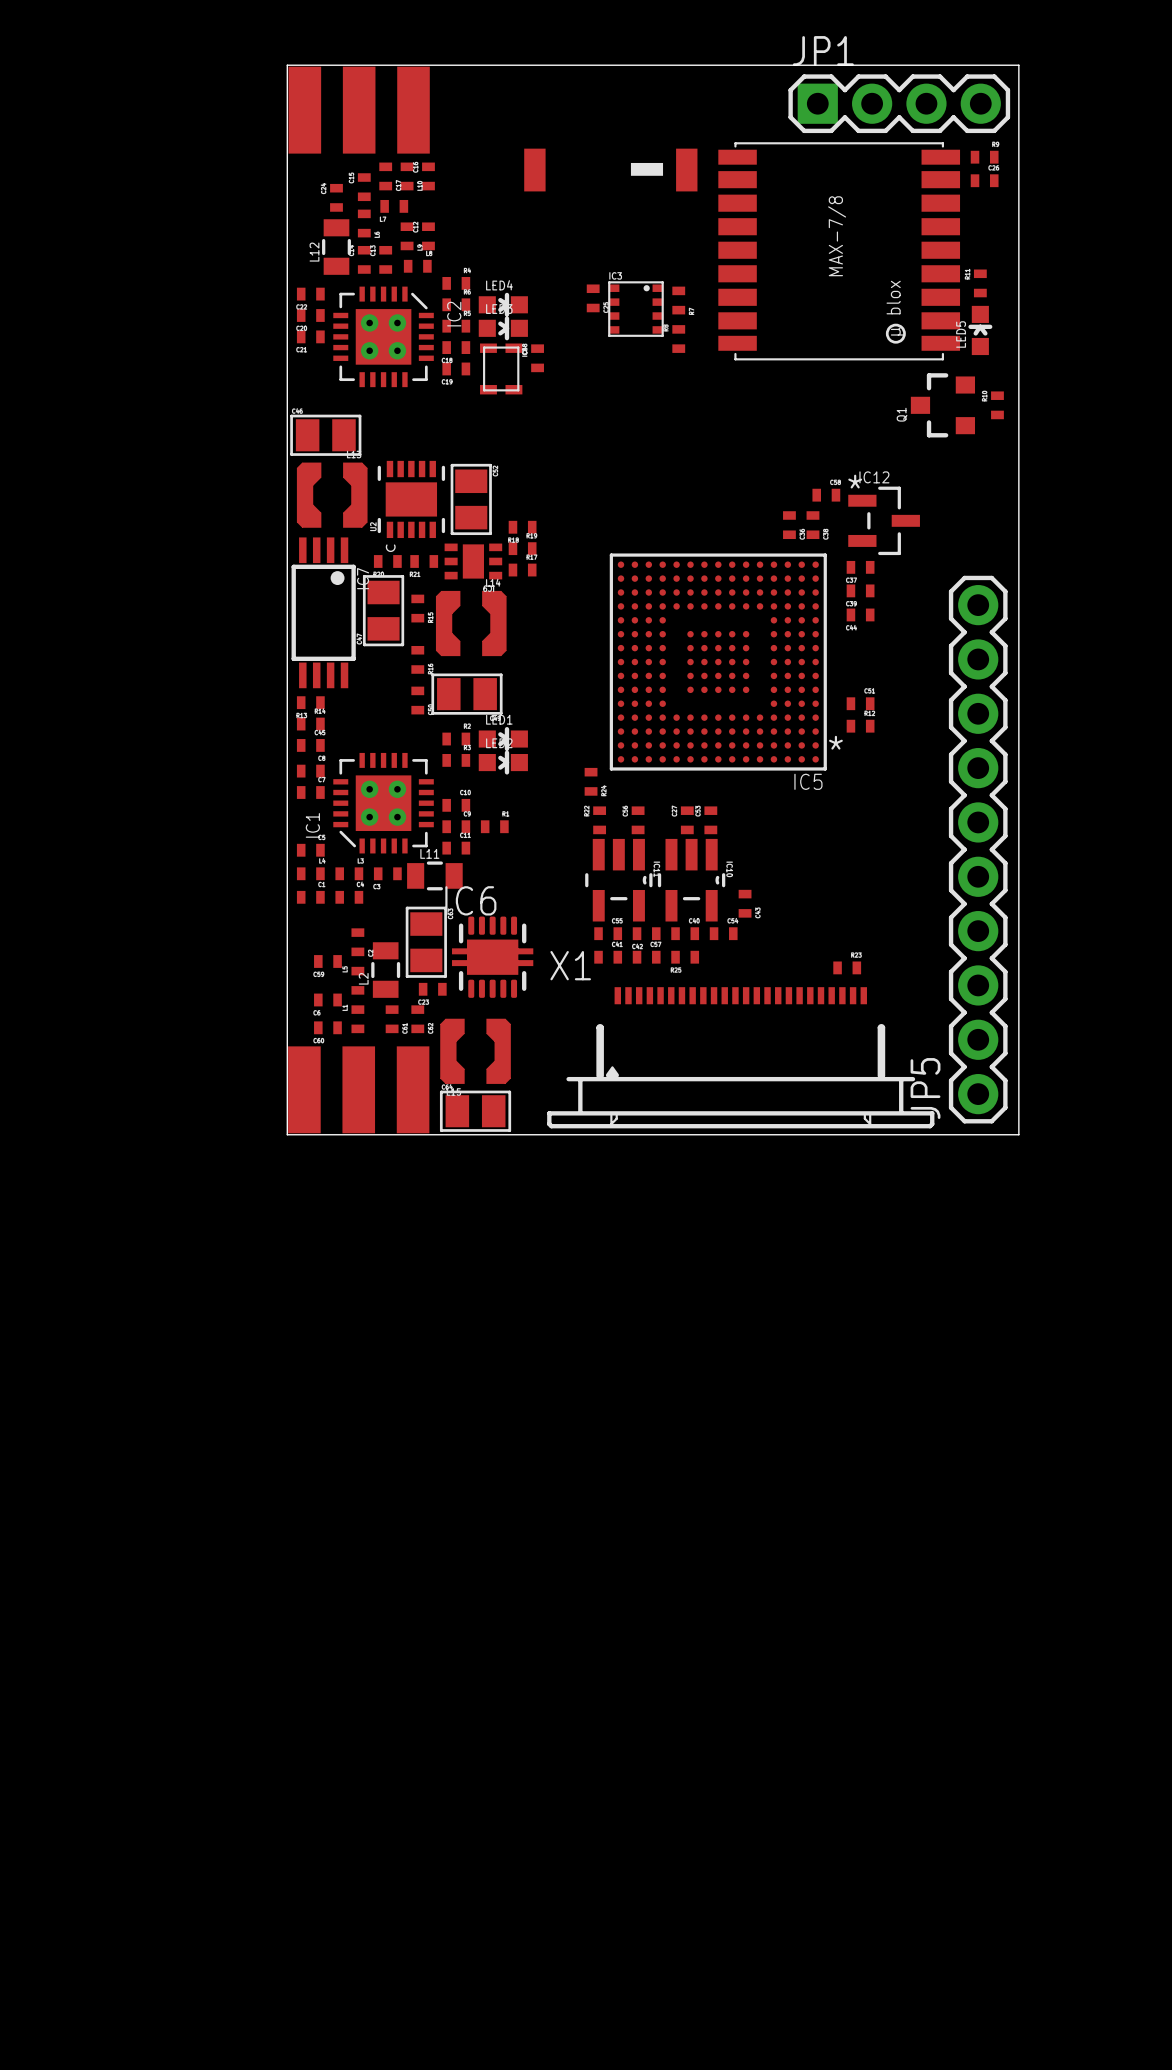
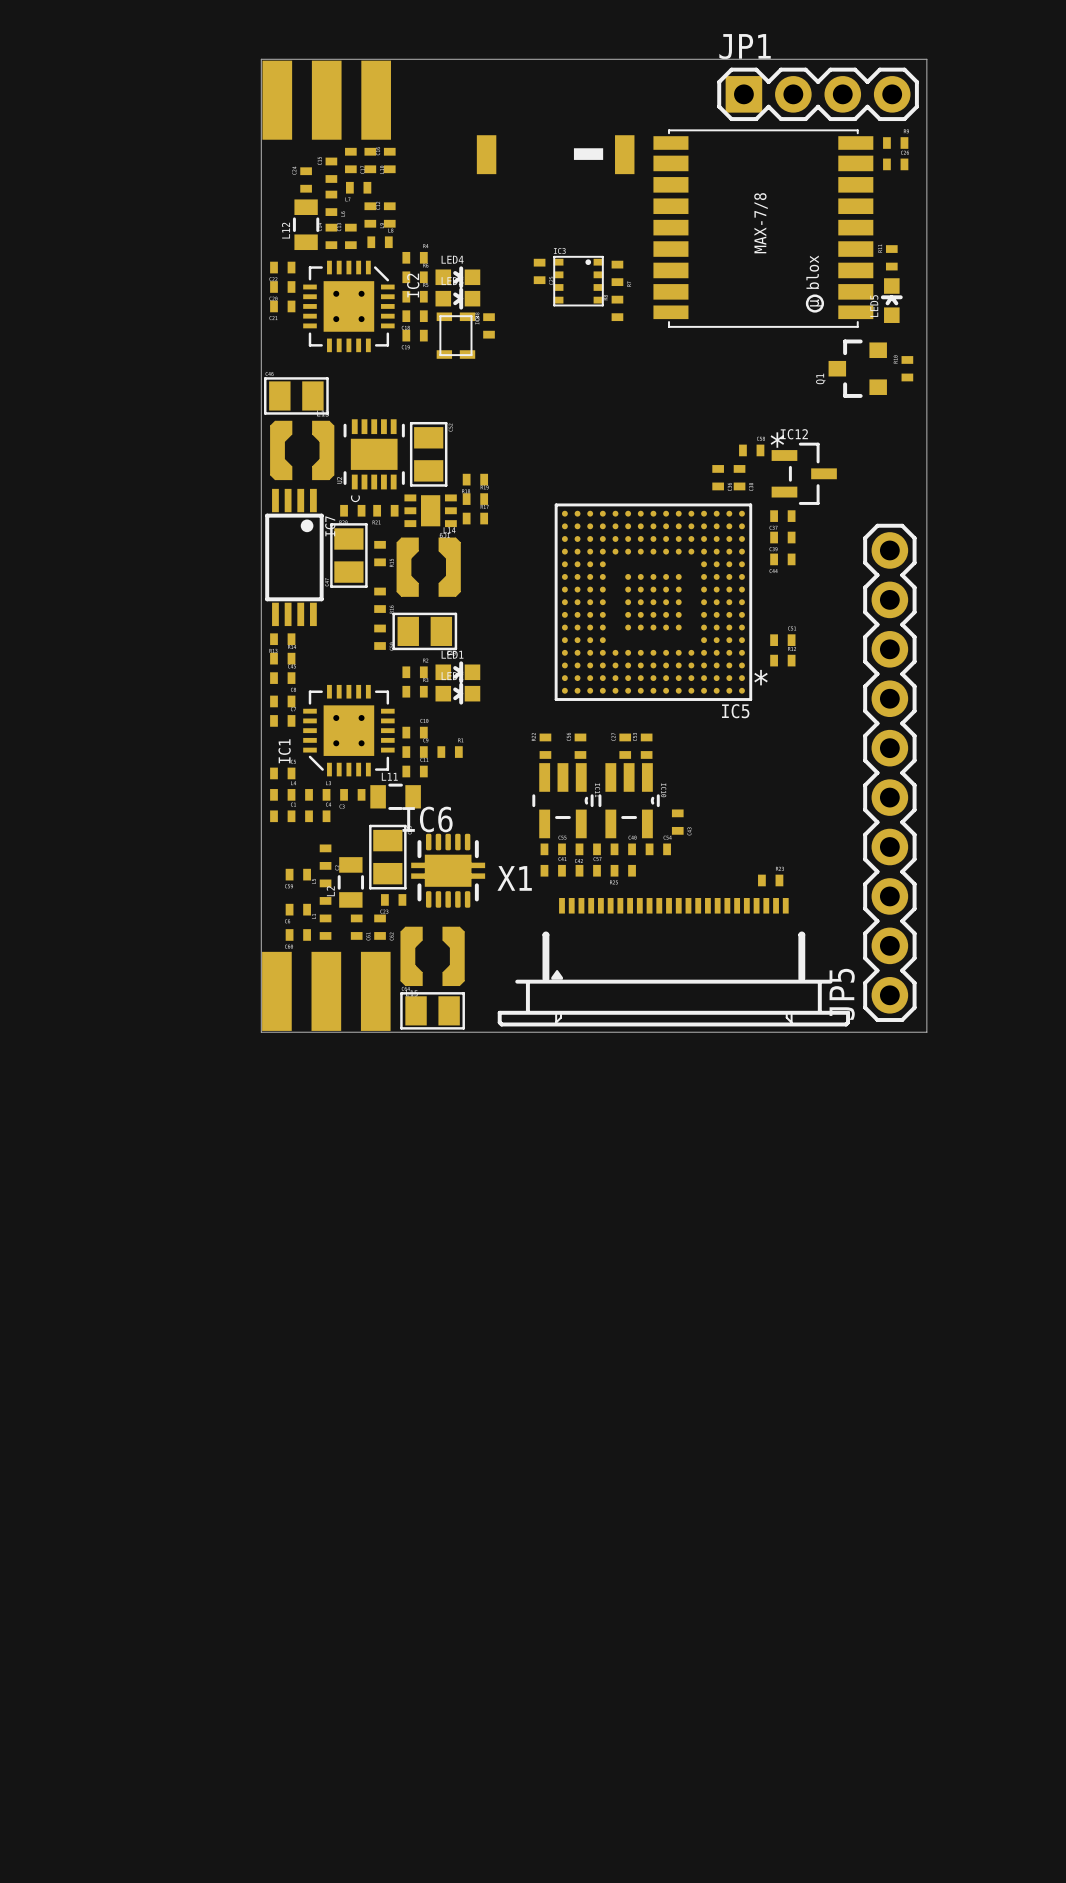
part: (591, 781) -> none

